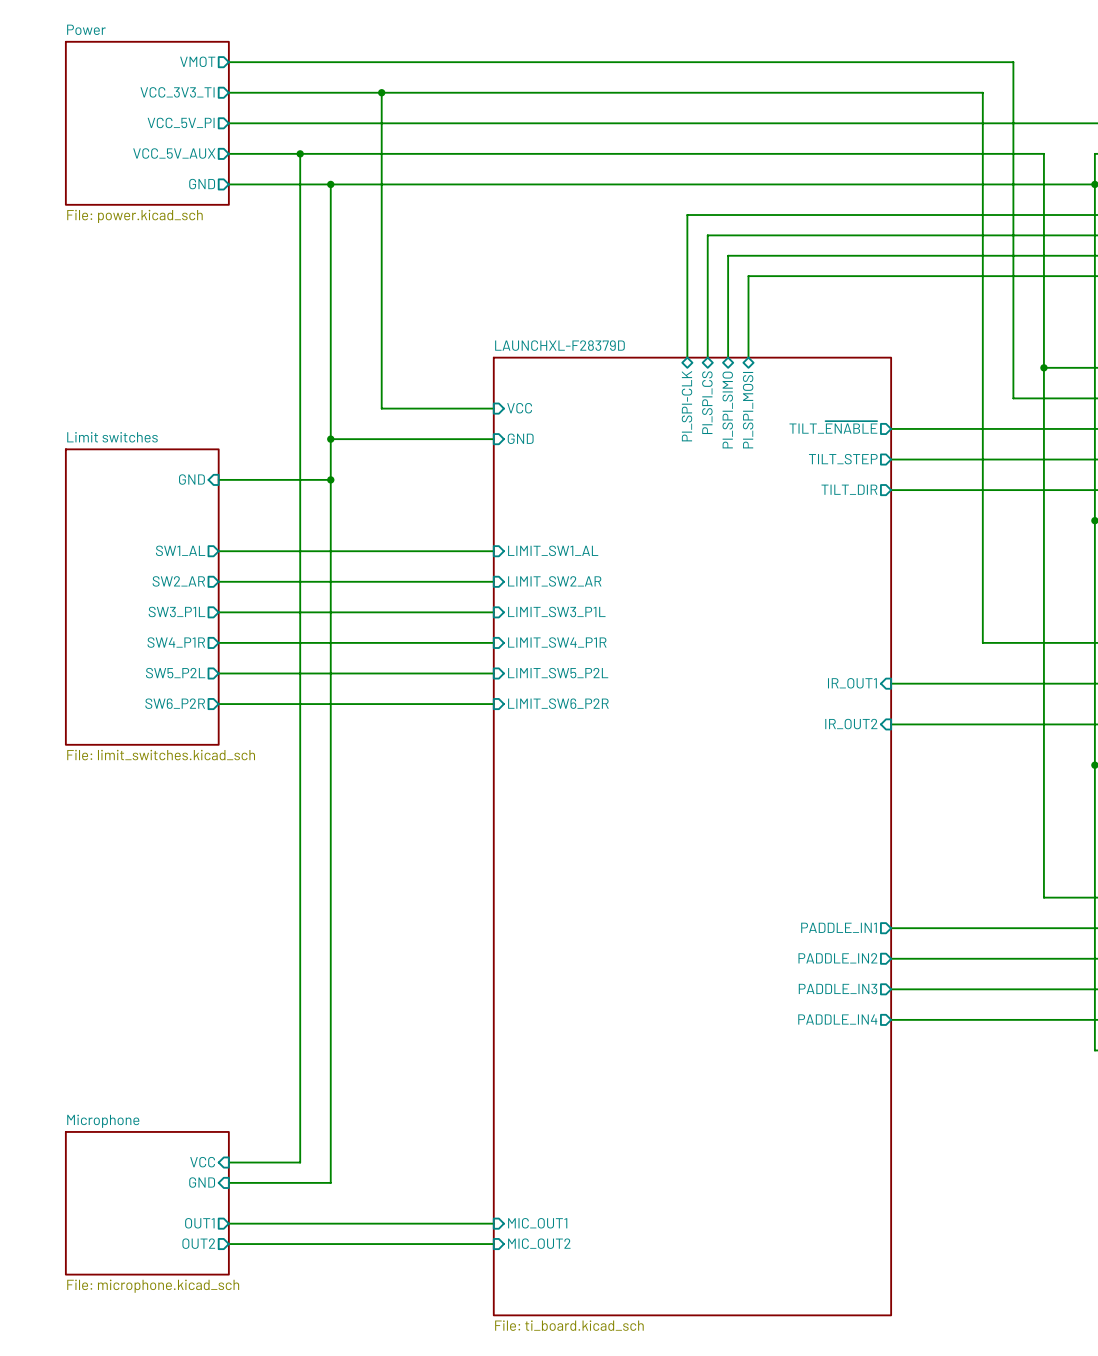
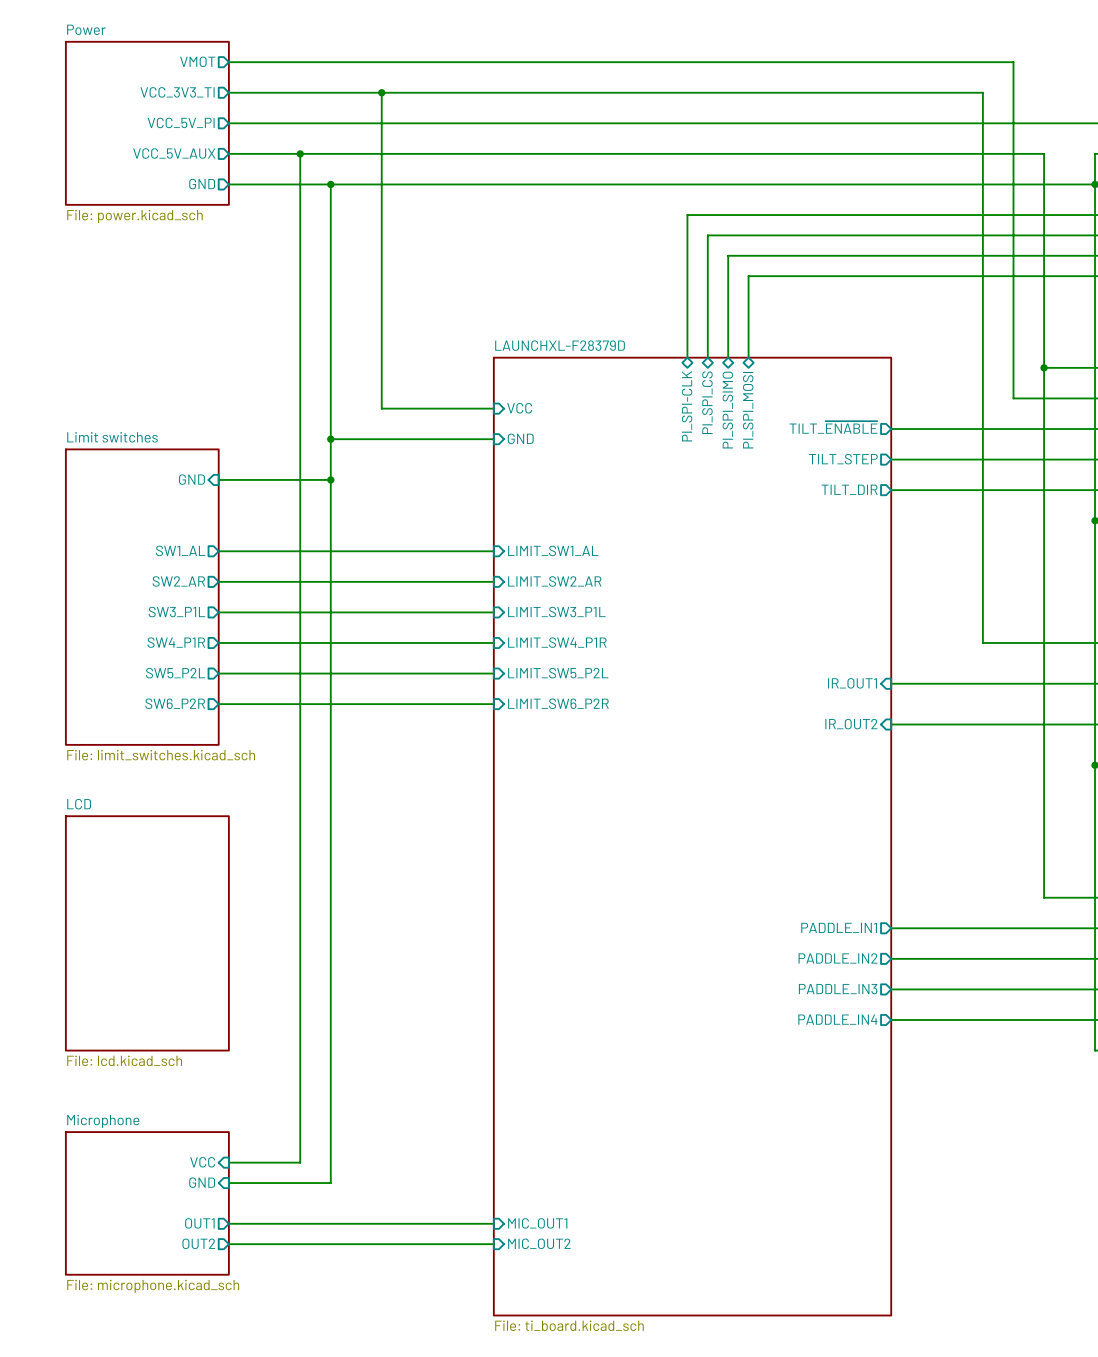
sheet LCD: none -> File: lcd.kicad_sch (147, 933)

